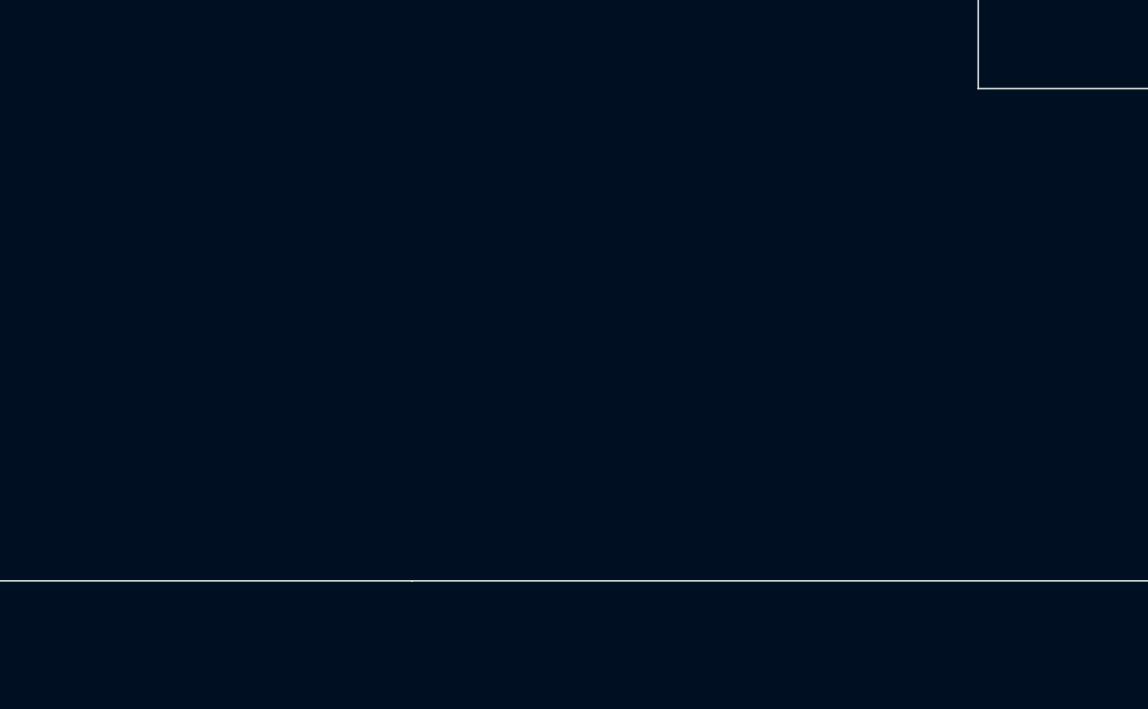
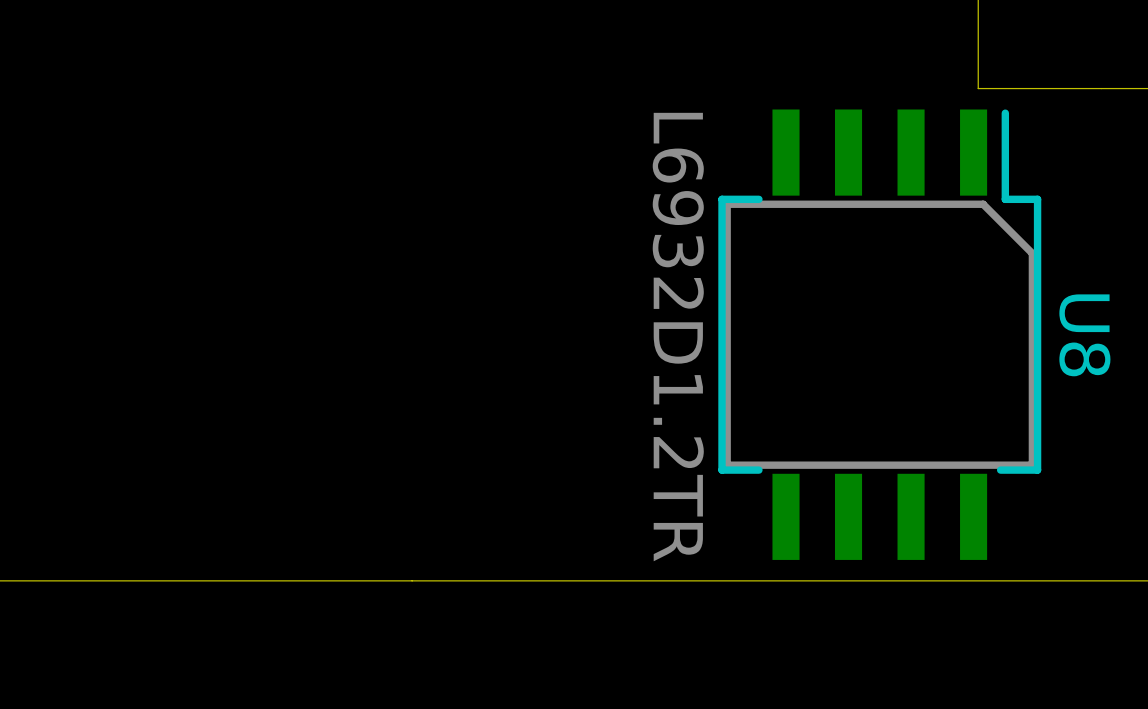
U8: none -> L6932D1.2TR (879, 334)

